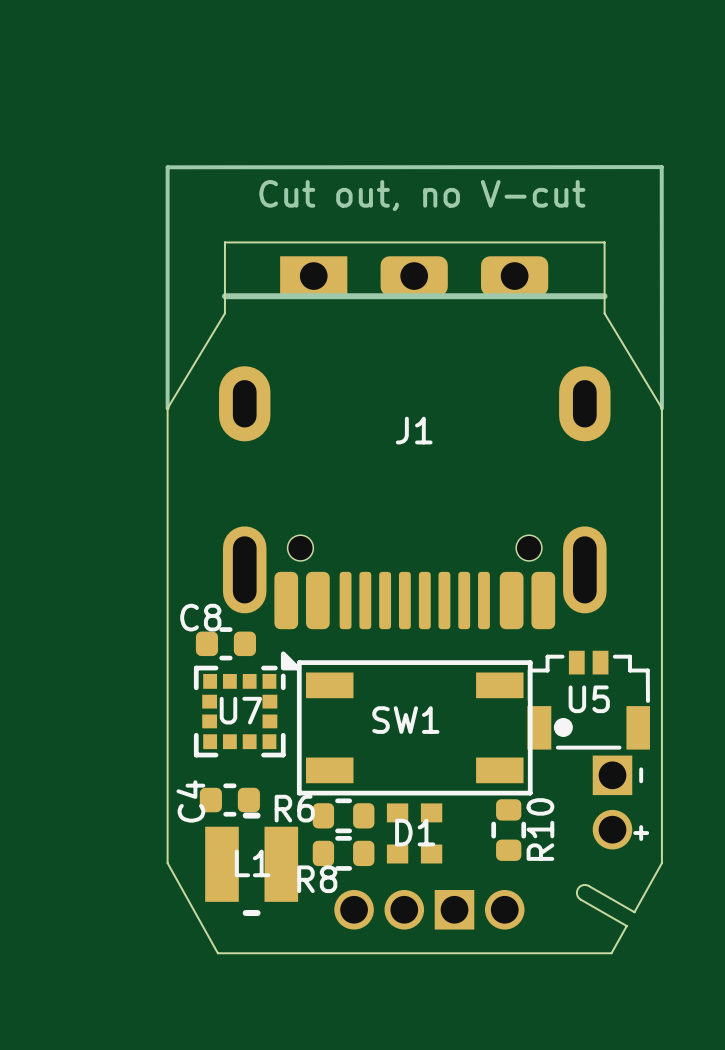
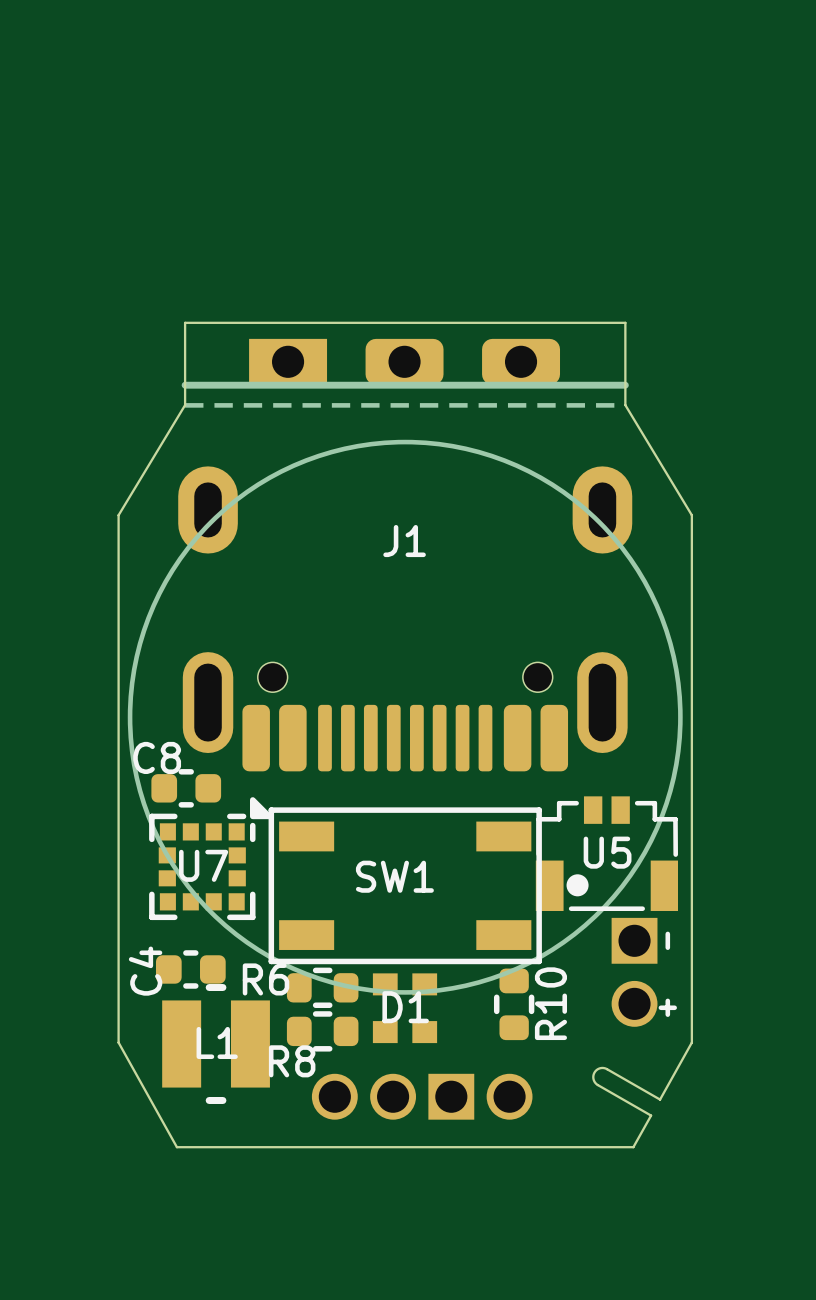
text: Cut out, no V-cut (422, 195) -> none
line: none -> (185, 405) (625, 405)
drawing: none -> [127, 439, 683, 995]
line: (167, 408) (167, 167) (661, 167) (661, 408) -> none

